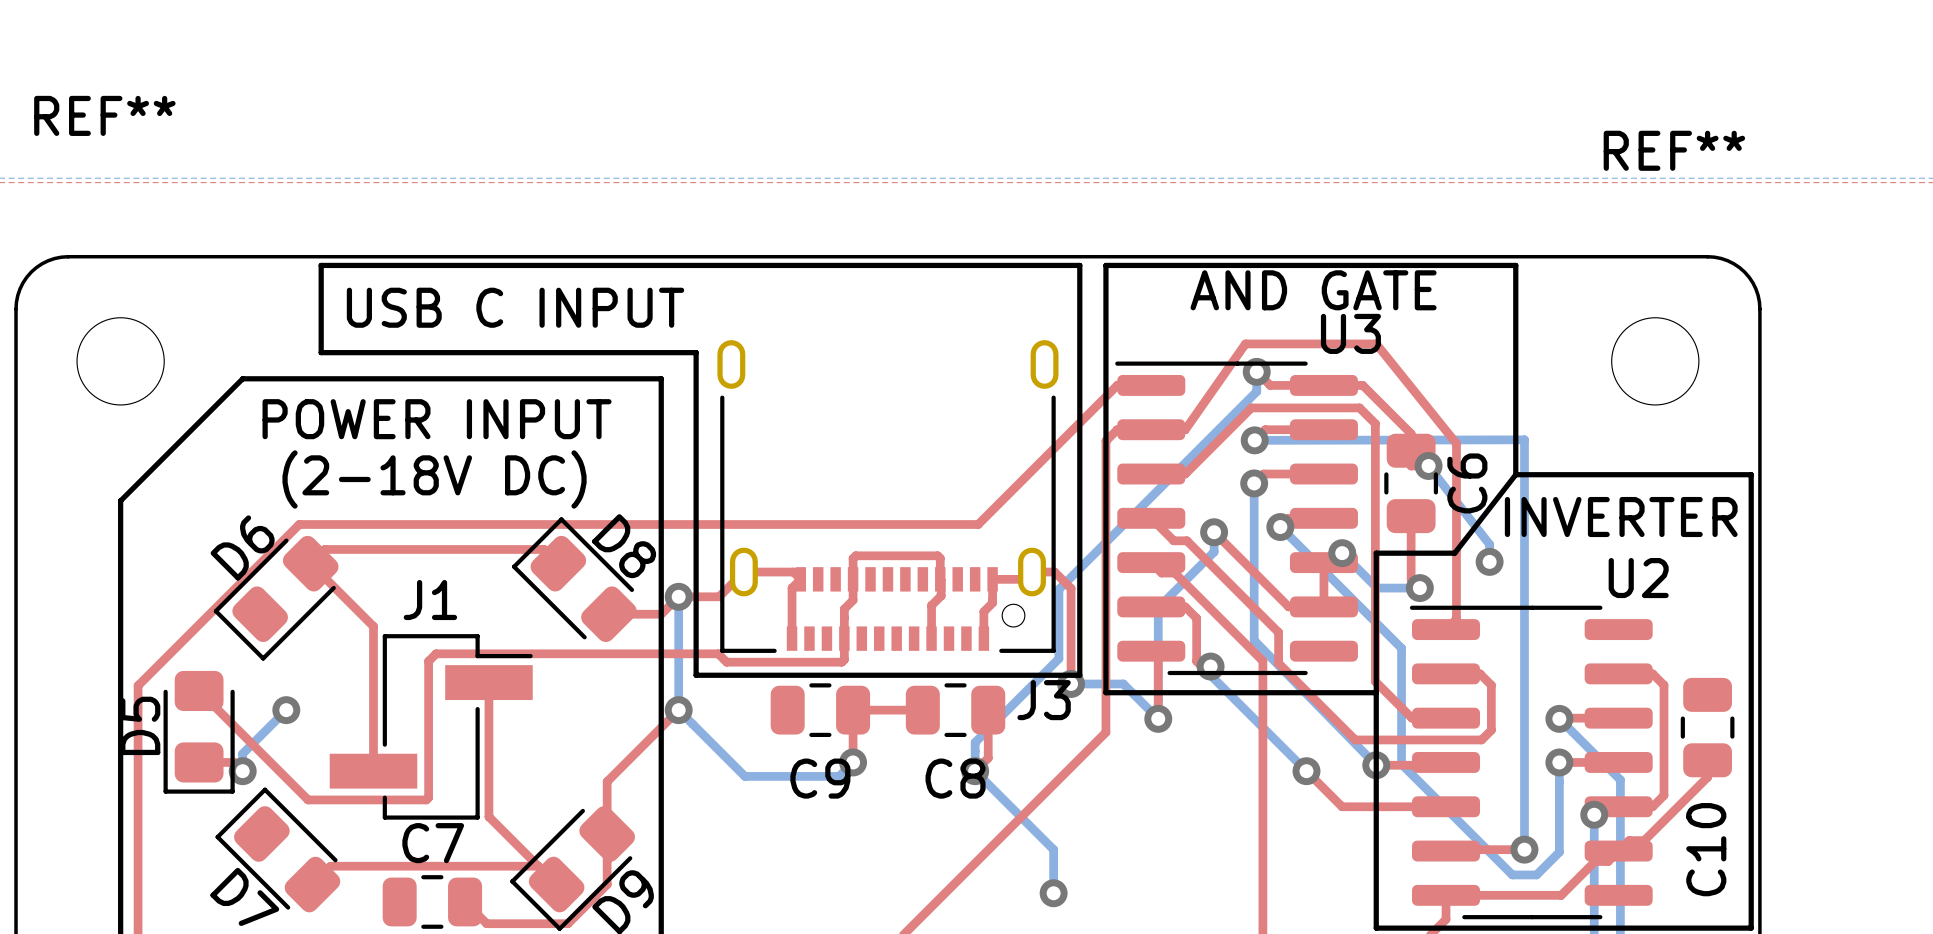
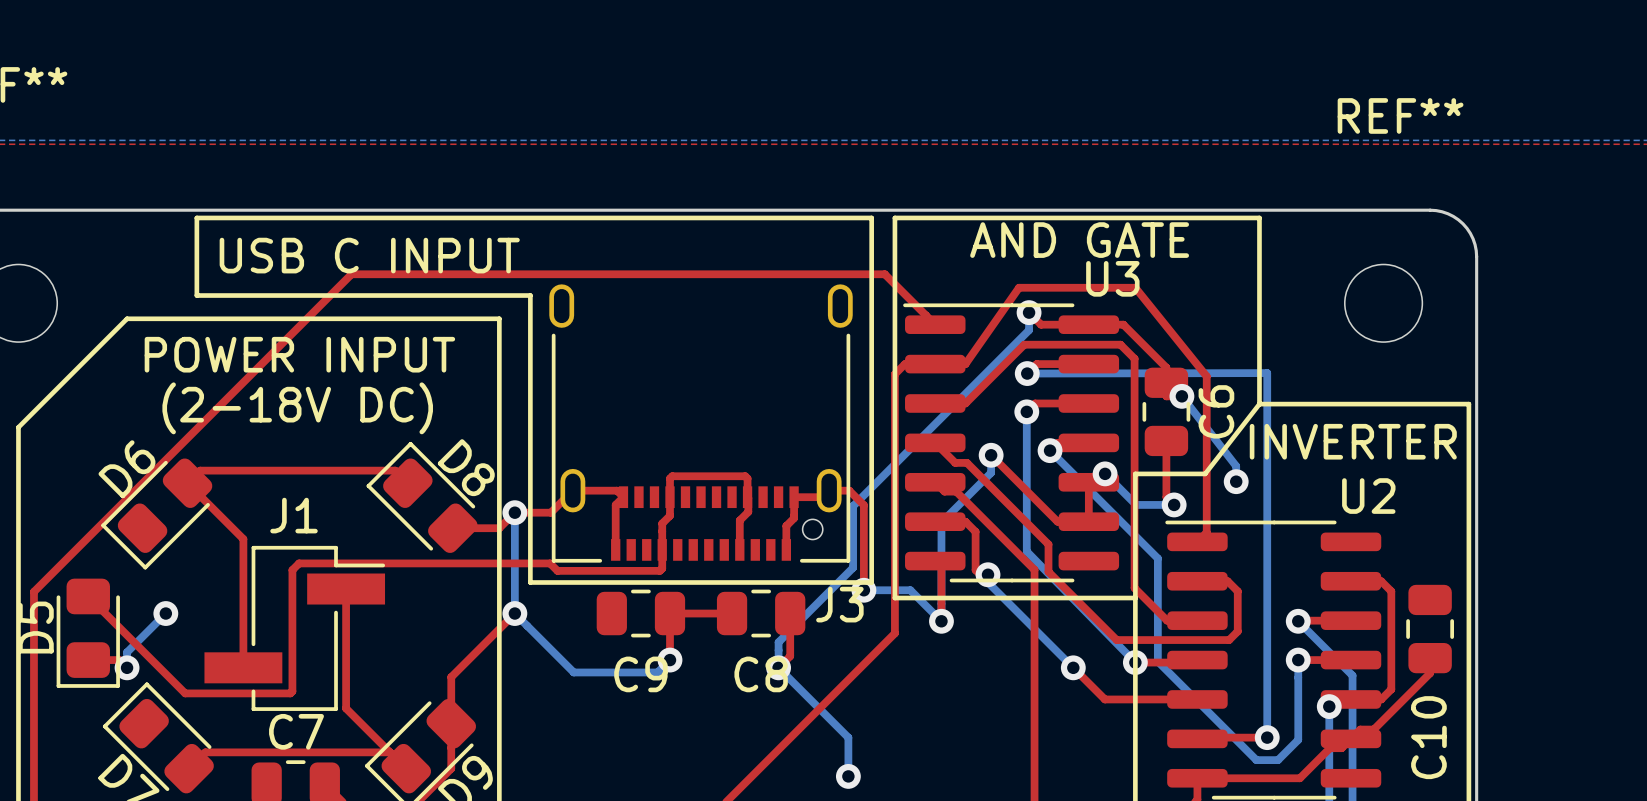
top track: (1151, 385) (1117, 385) (978, 524) (299, 524) -> (935, 324) (884, 274) (351, 274) (177, 448)

